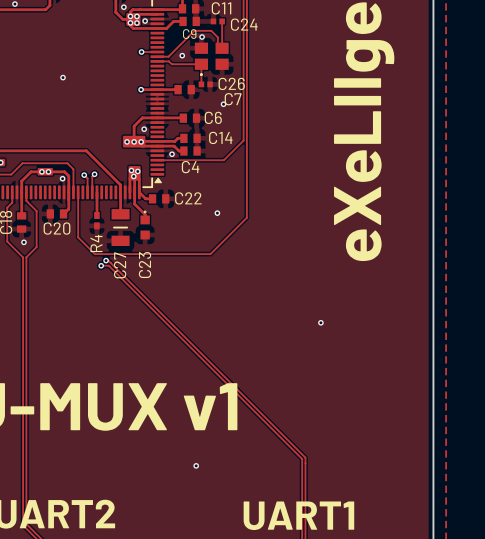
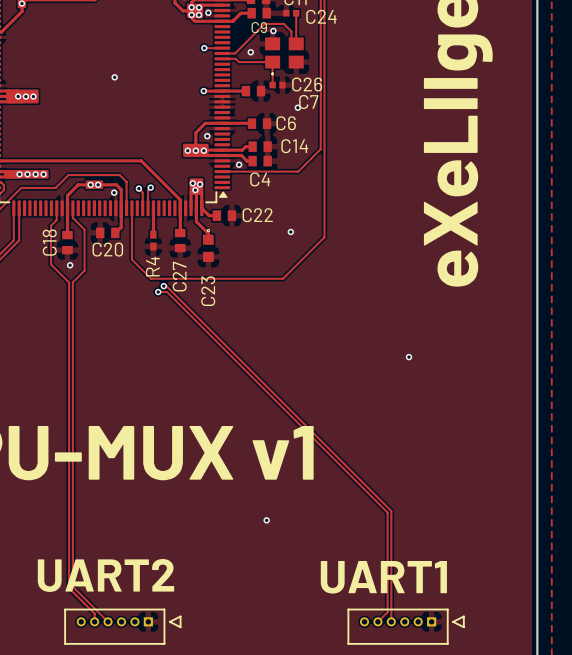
C27 footprint: [111, 209, 130, 247] -> [174, 228, 186, 253]

